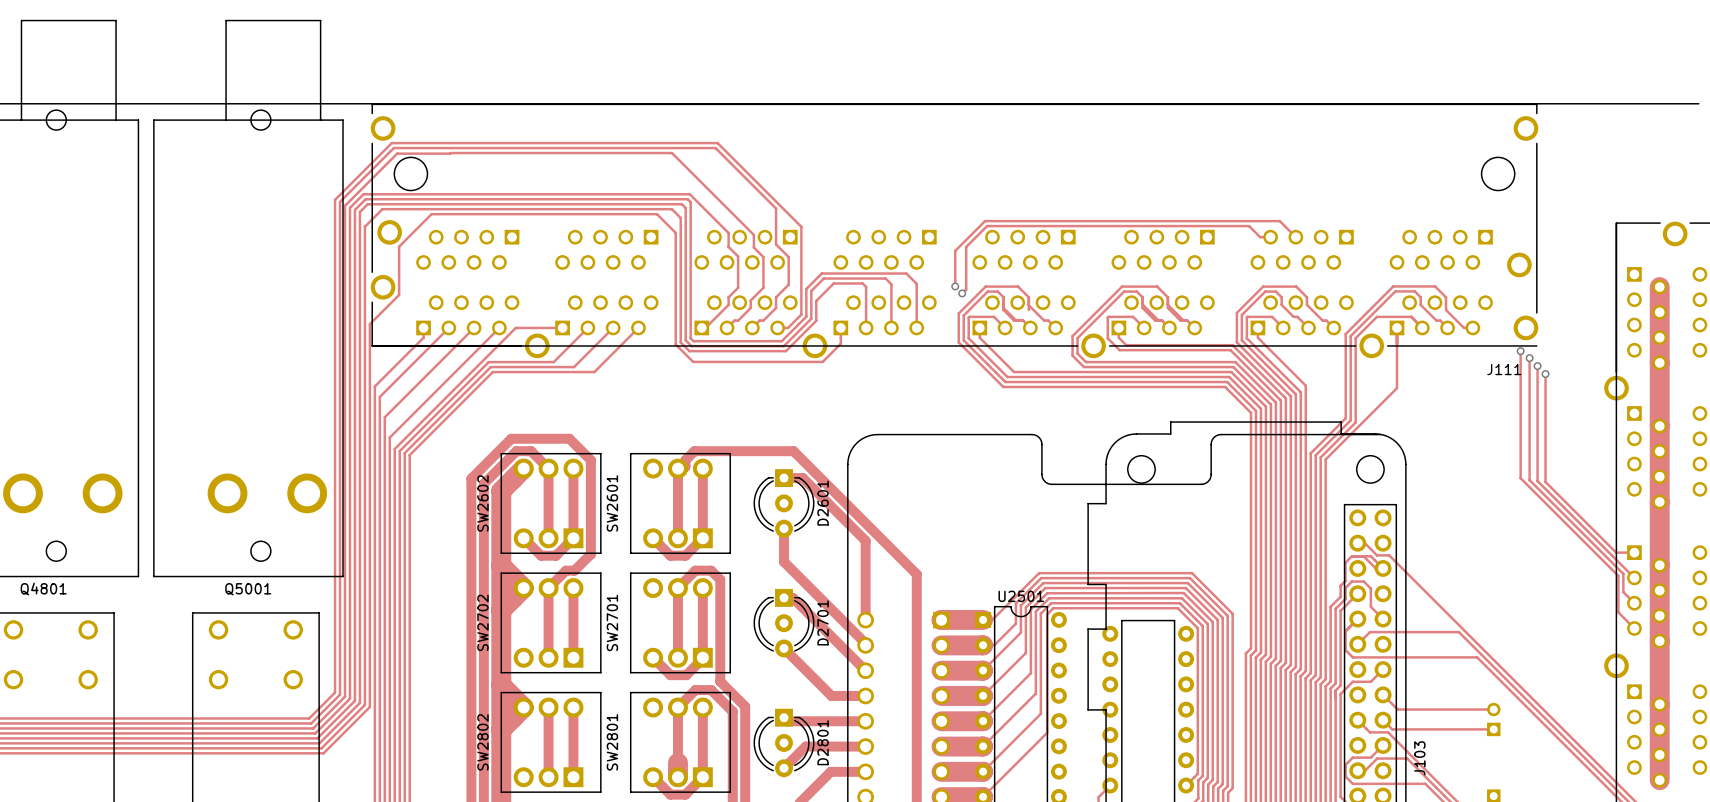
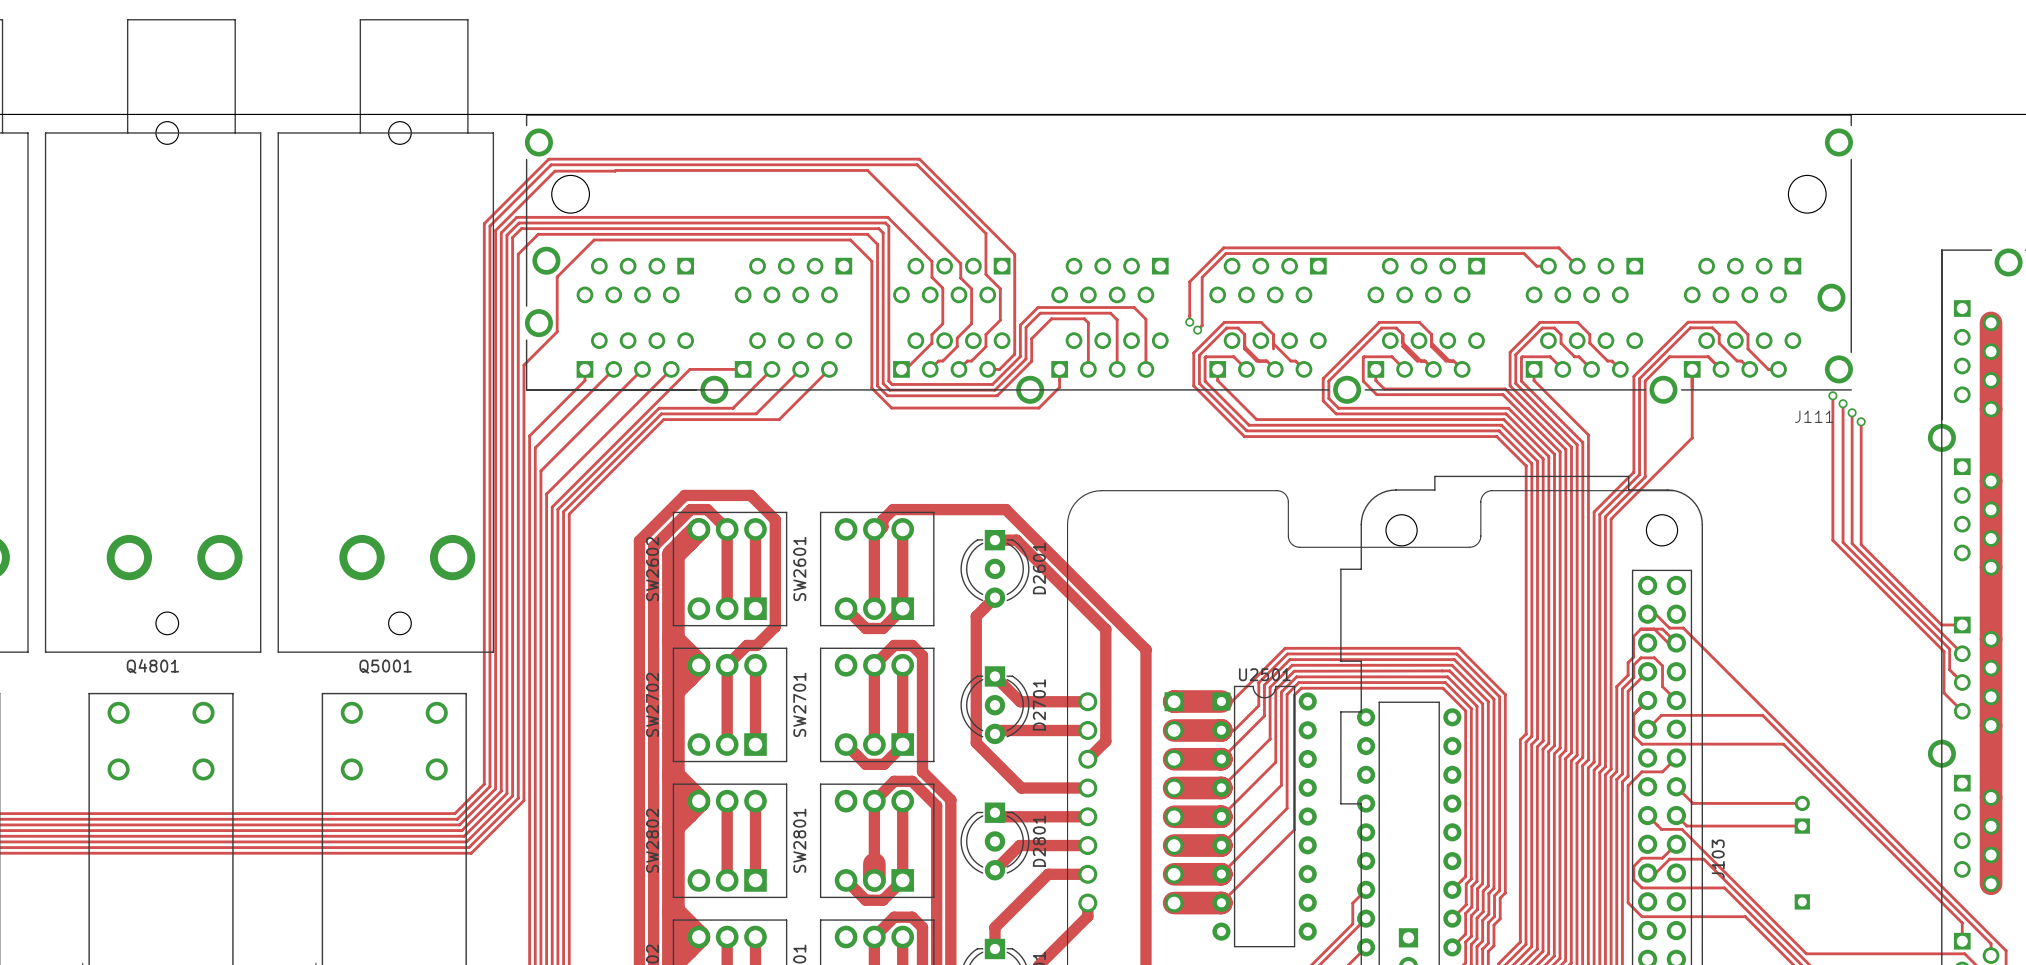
track: (784, 528) (784, 561) (865, 645) -> (994, 597) (976, 616) (976, 742) (1021, 788) (1049, 788)
track: (523, 538) (541, 555) (556, 555) (573, 538) -> none
track: (865, 540) (865, 620) -> (1087, 611) (1105, 629) (1105, 741) (1087, 759)
track: (784, 597) (792, 597) (865, 670) -> (994, 676) (1020, 701) (1087, 701)
track: (784, 648) (831, 695) -> (994, 733) (998, 730) (1087, 730)

